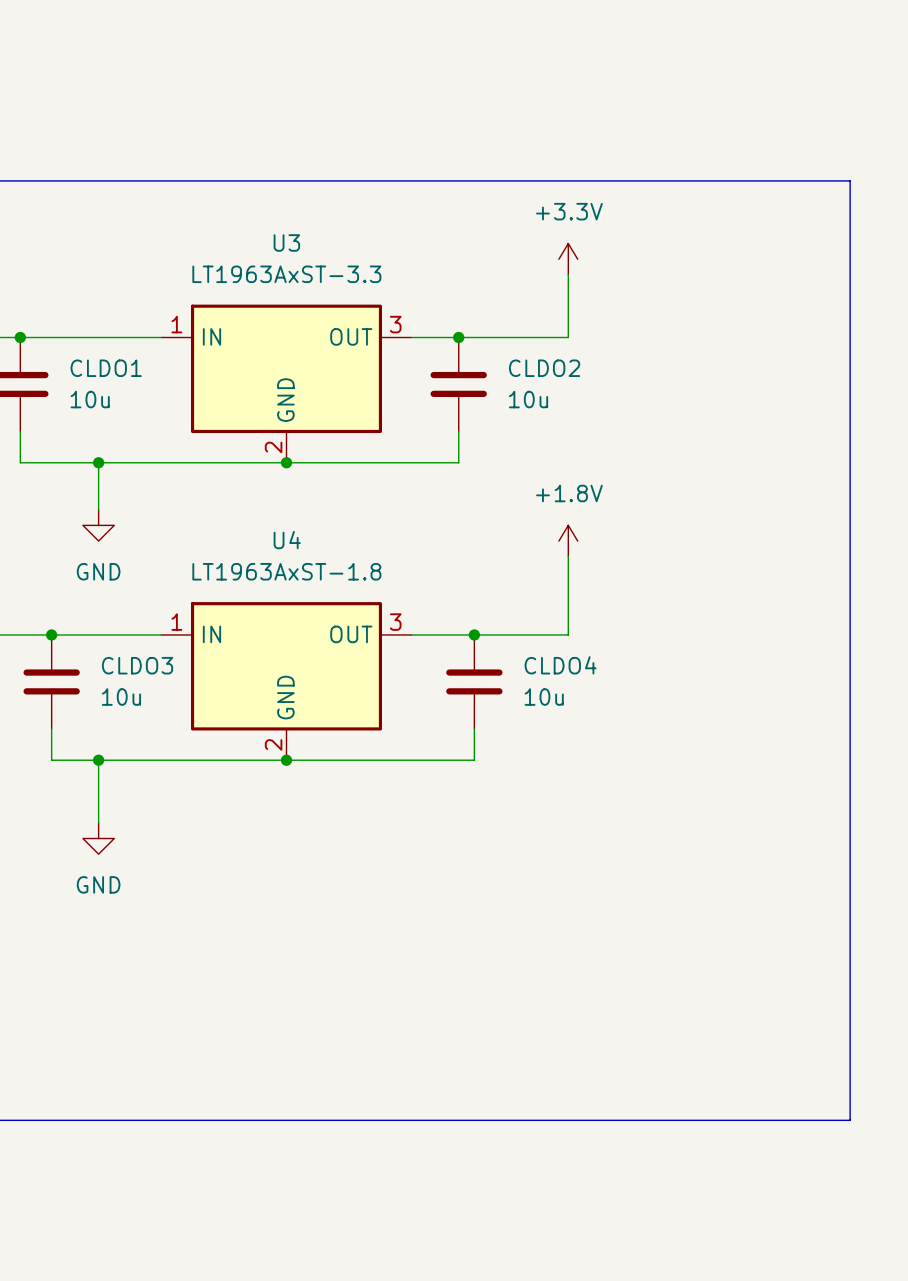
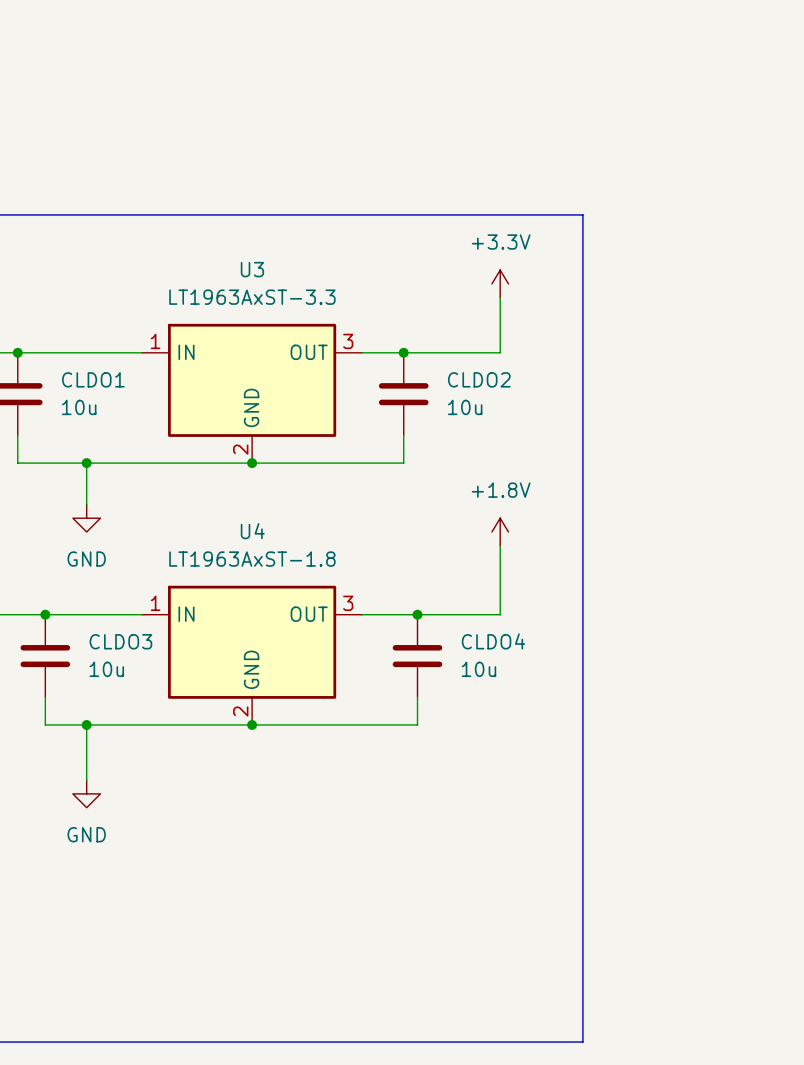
line: (662, 180) (850, 180) (850, 1120) (662, 1120) -> (582, 214) (582, 1042)

